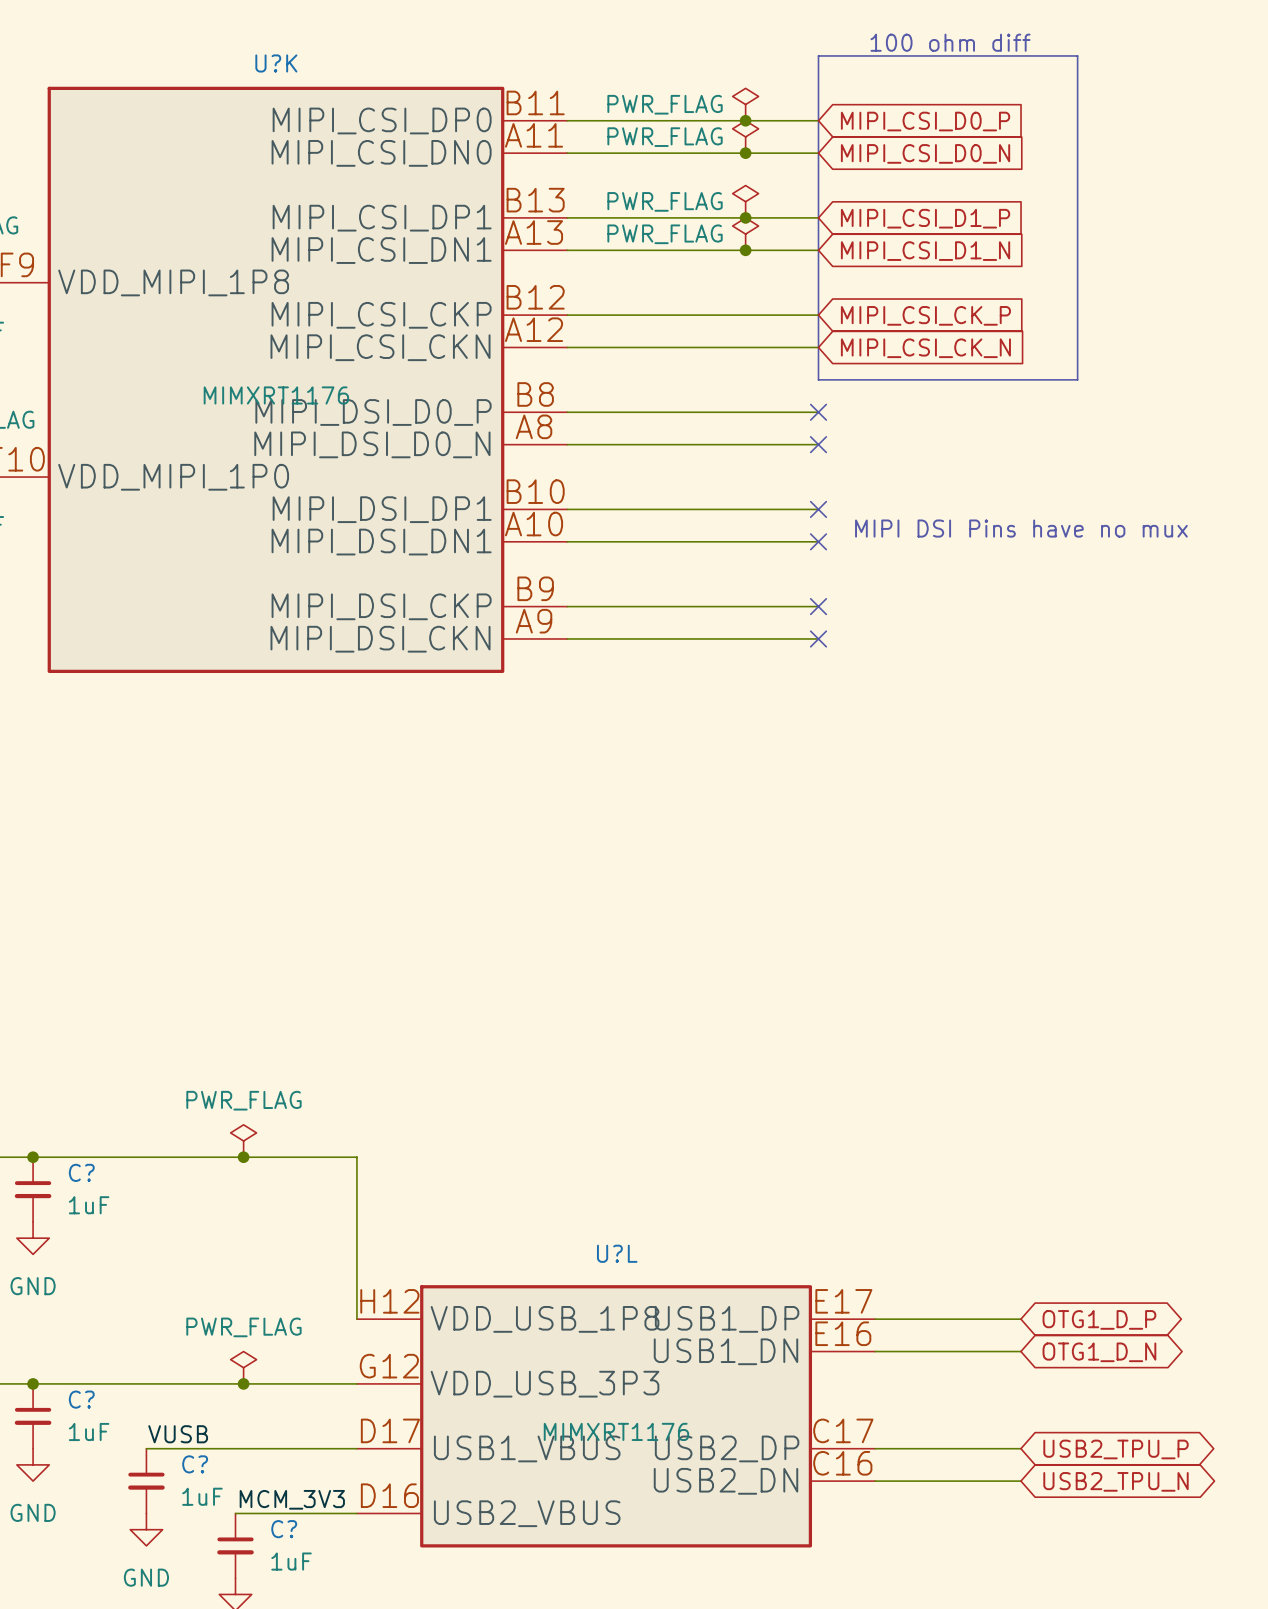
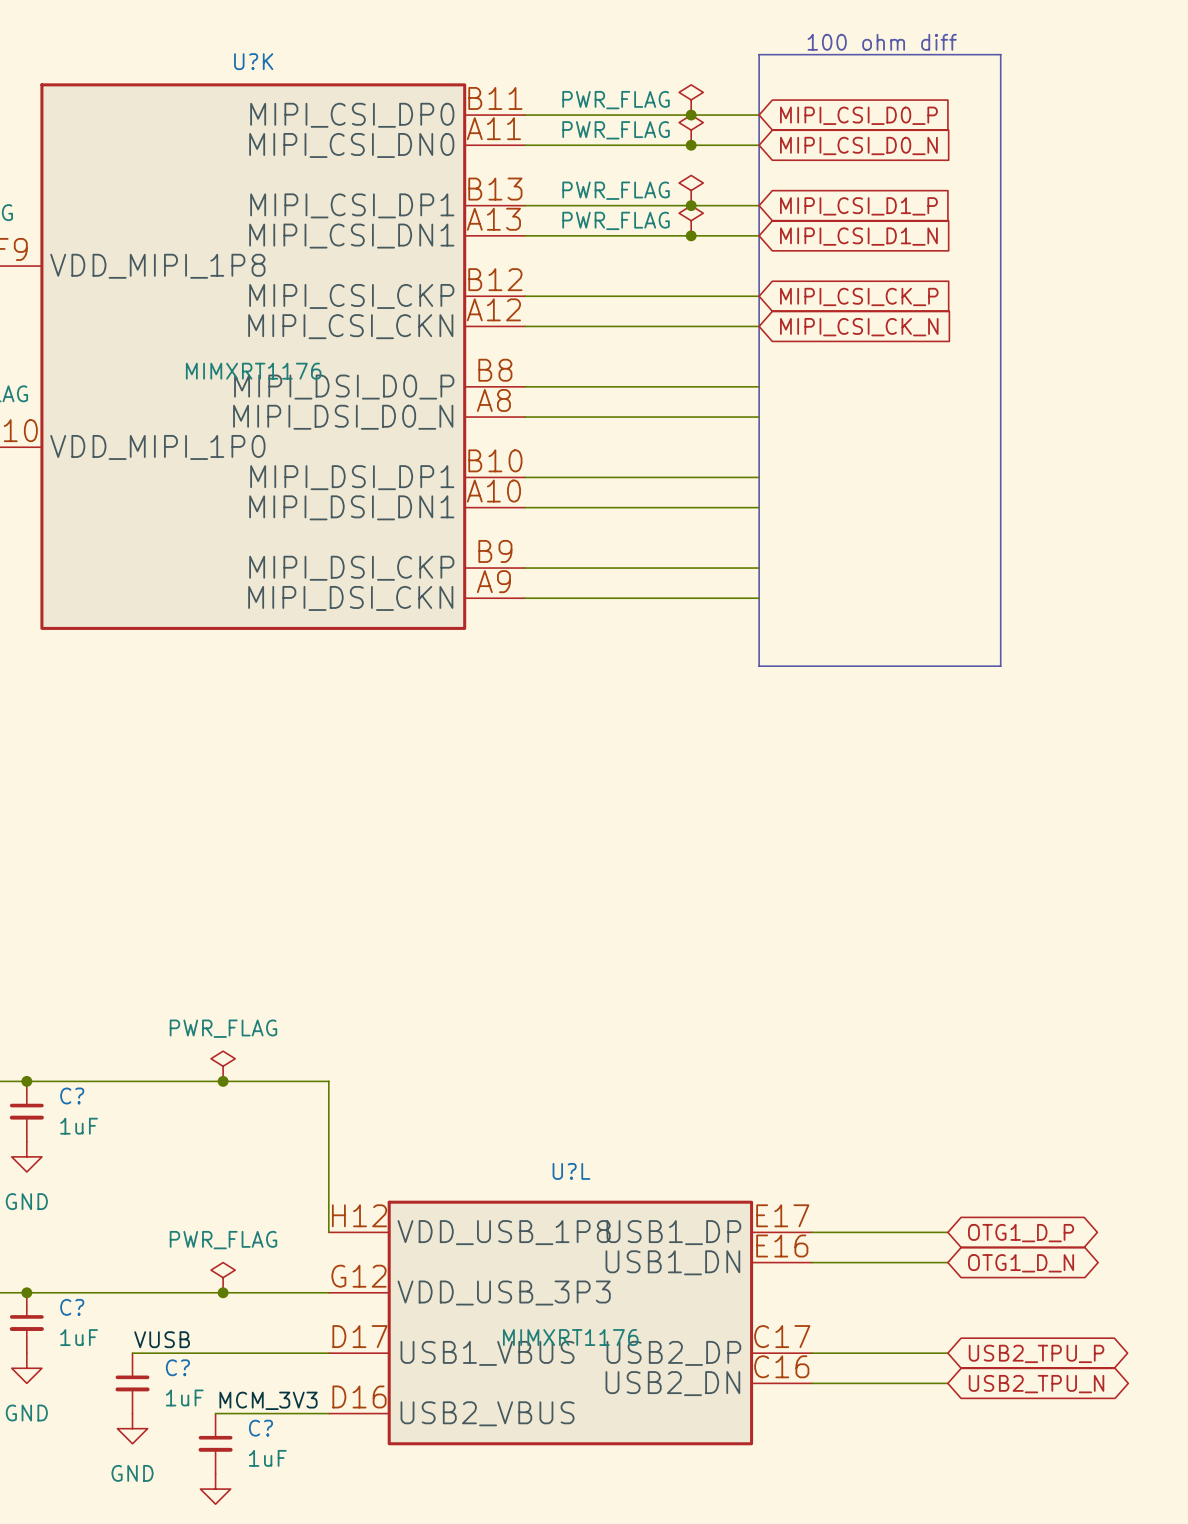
line: (818, 379) (1077, 379) -> (759, 356) (759, 666) (1000, 666) (1000, 356)
no-connect mark: (818, 412) -> none
no-connect mark: (818, 444) -> none
no-connect mark: (818, 509) -> none
text: MIPI DSI Pins have no mux (1021, 528) -> none
no-connect mark: (818, 541) -> none
no-connect mark: (818, 606) -> none
no-connect mark: (818, 638) -> none

